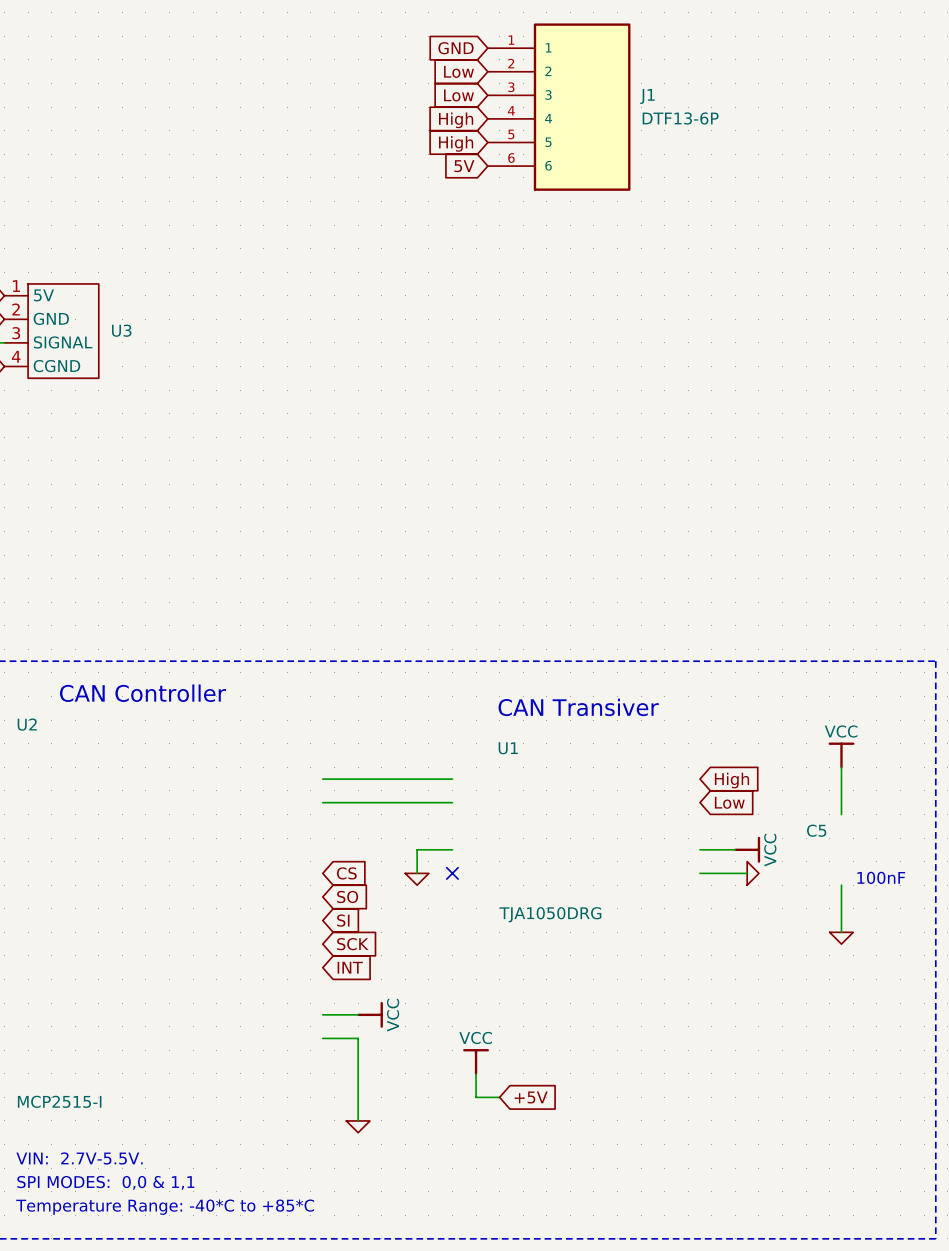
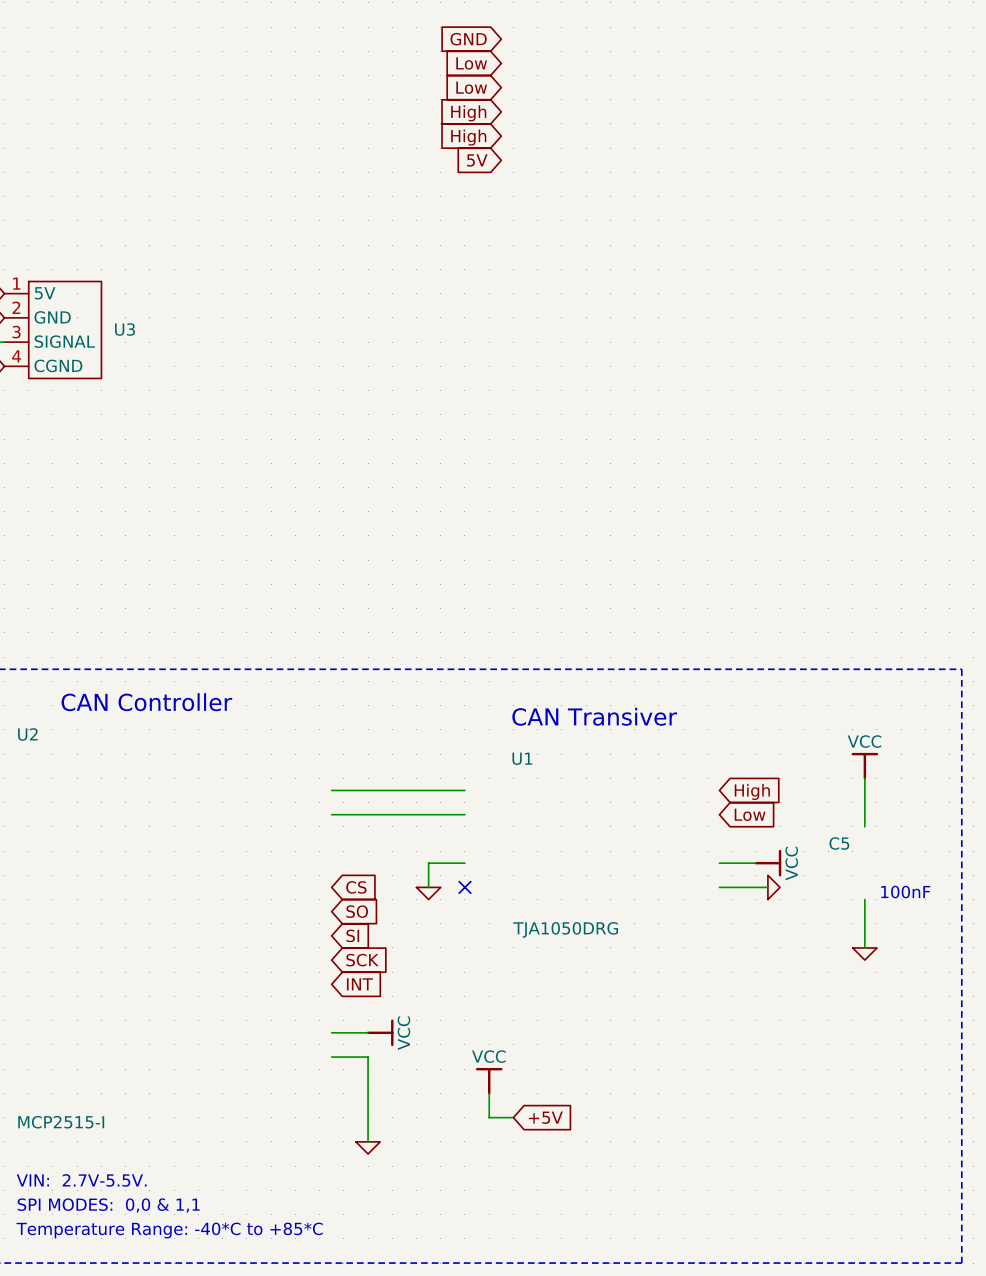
J1: DTF13-6P (559, 107) -> none

